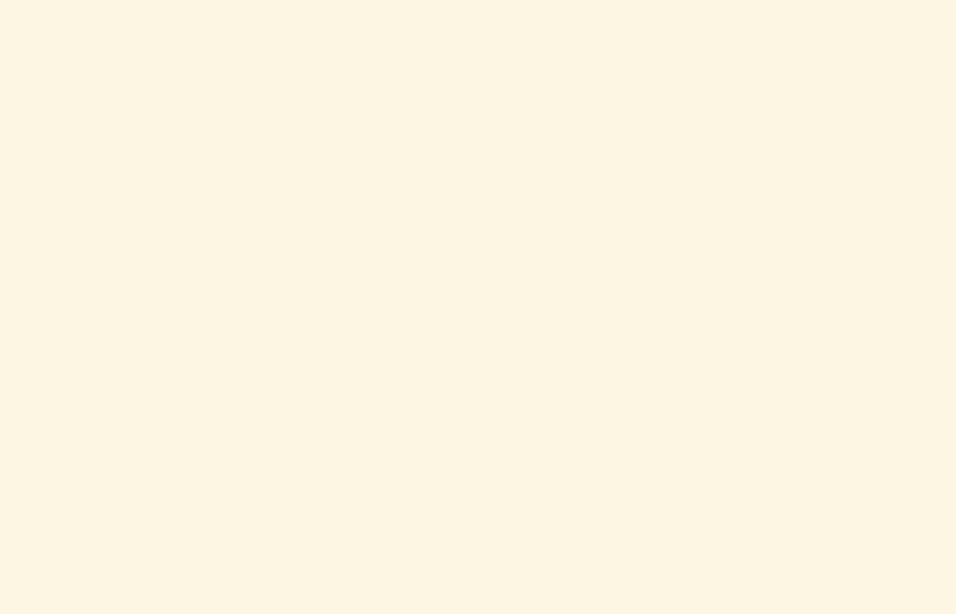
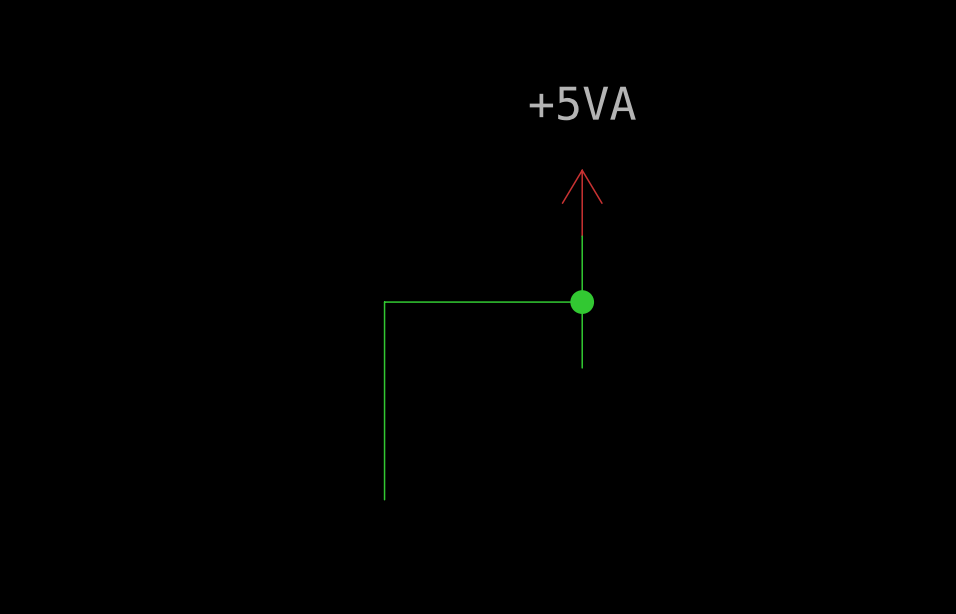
power symbol: none -> +5VA (582, 203)
wire: none -> (582, 236) (582, 367)
wire: none -> (582, 302) (384, 302) (384, 499)
junction: none -> (582, 302)

